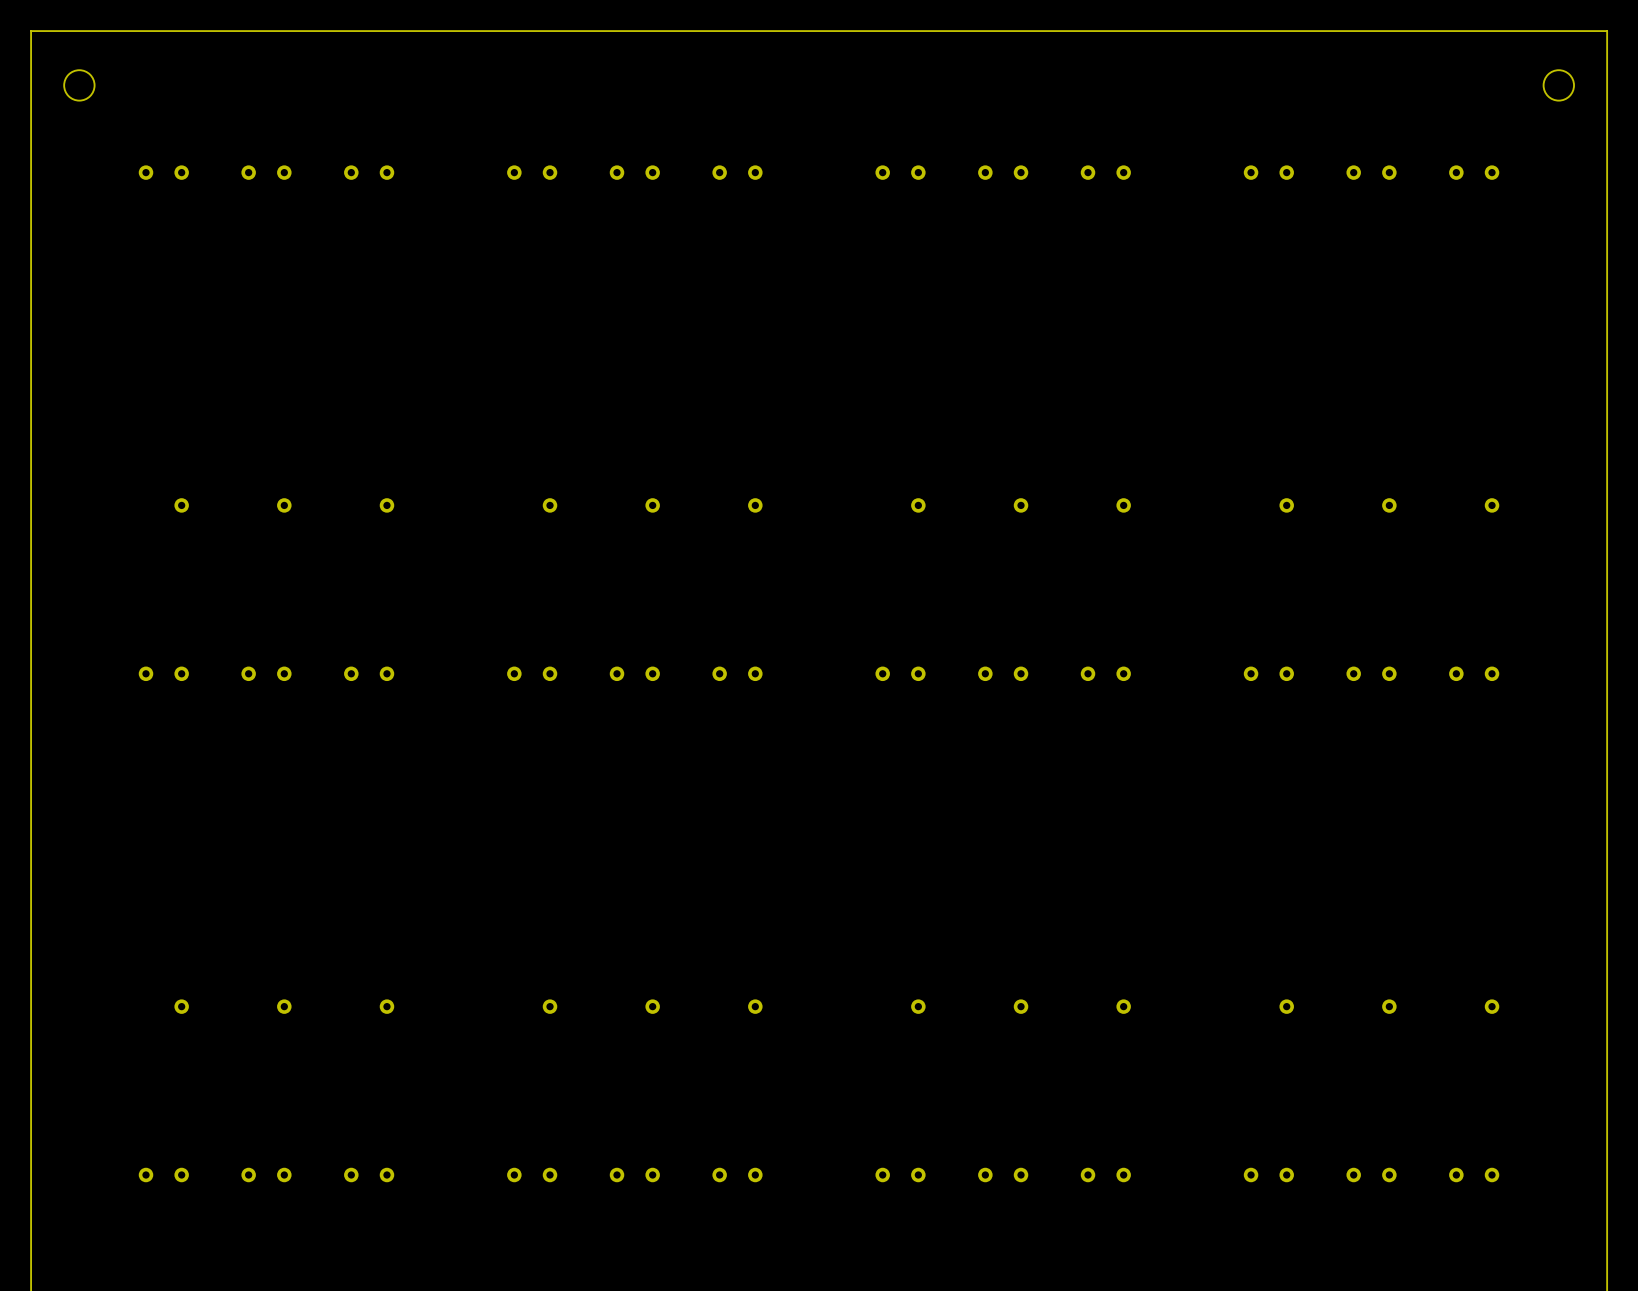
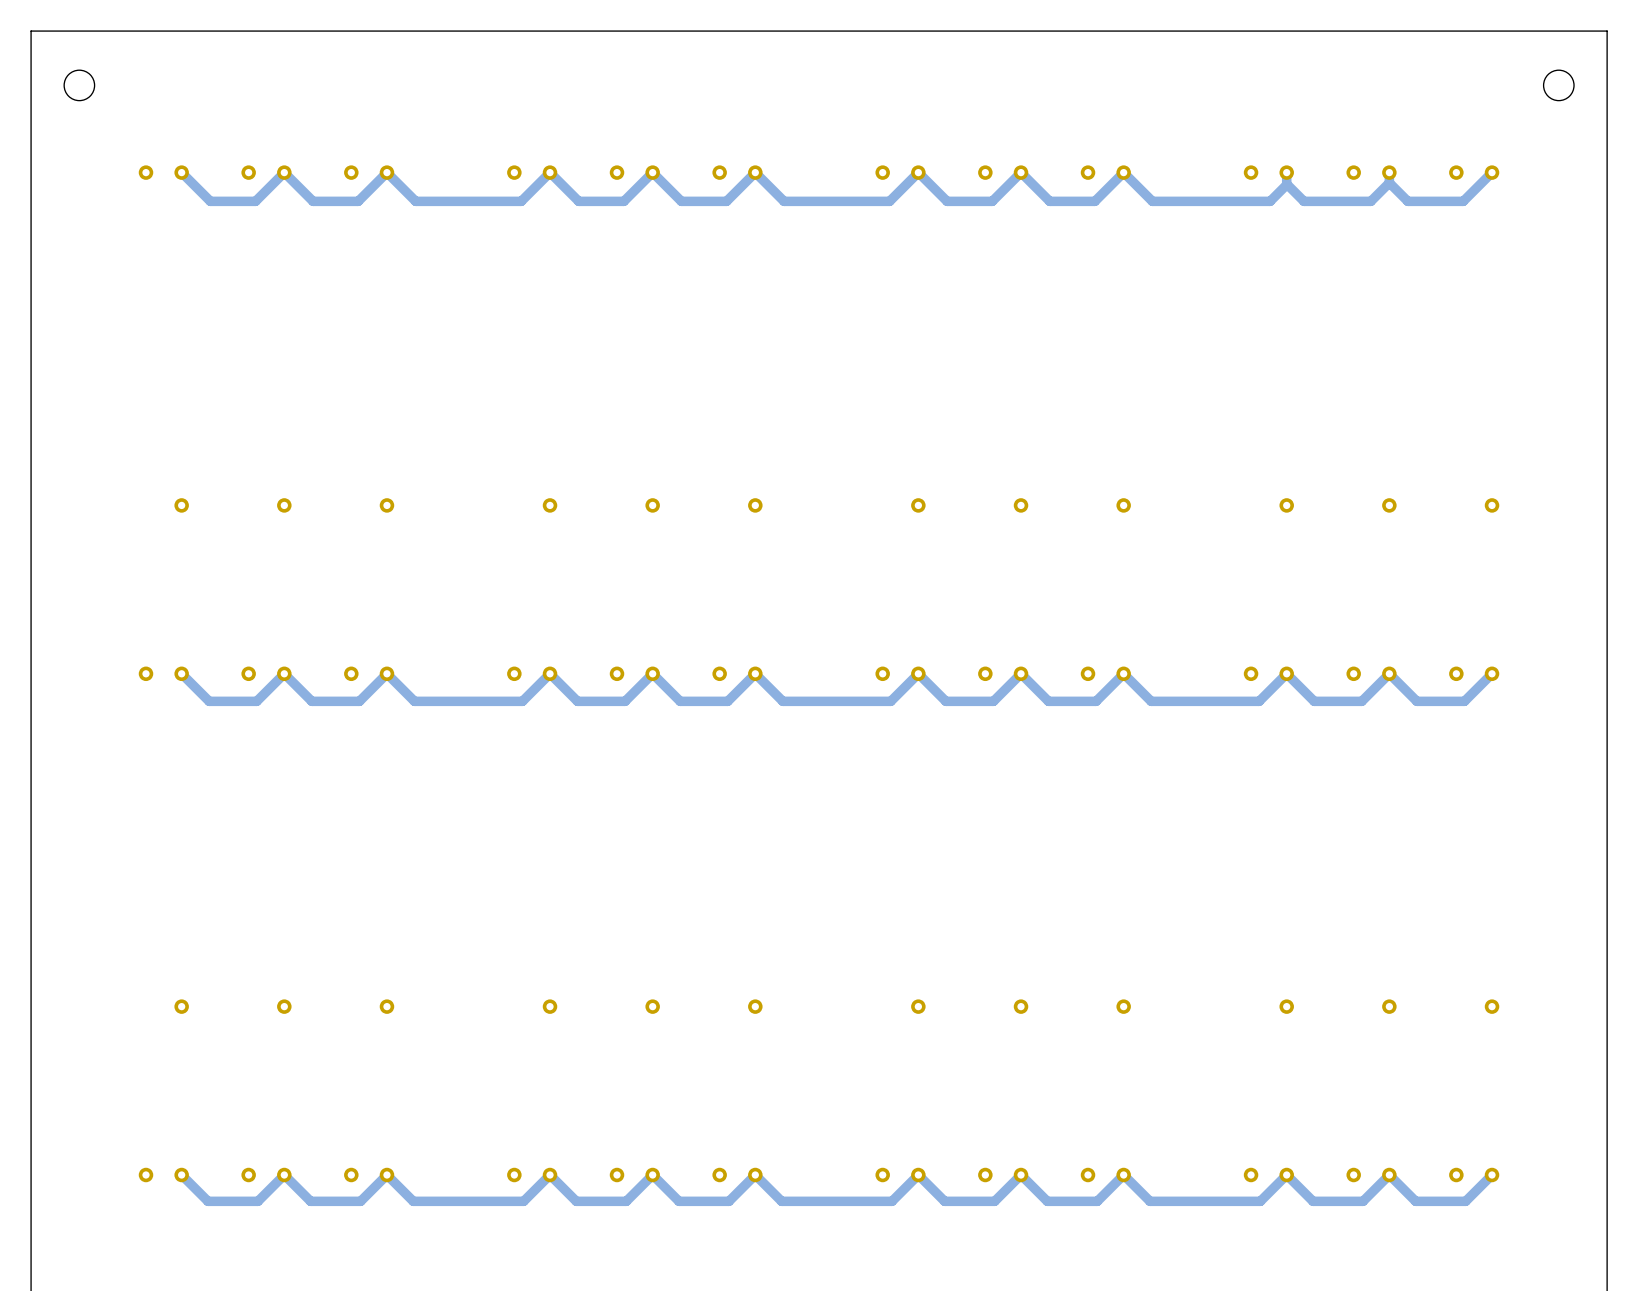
track: none -> (1286, 172) (1286, 184) (1270, 201) (1152, 201) (1123, 172) (1094, 201) (1049, 201) (1021, 172) (992, 201) (947, 201) (918, 172) (889, 201) (784, 201) (755, 172) (726, 201) (681, 201) (652, 172) (623, 201) (578, 201) (550, 172) (521, 201) (415, 201) (386, 172) (358, 201) (313, 201) (284, 172) (255, 201) (210, 201) (181, 172)
track: none -> (1492, 172) (1463, 201) (1407, 201) (1389, 182)
track: none -> (1389, 182) (1370, 201) (1303, 201) (1286, 184)
track: none -> (1492, 673) (1464, 701) (1416, 701) (1389, 673) (1361, 701) (1314, 701) (1286, 673) (1259, 701) (1151, 701) (1123, 673) (1096, 701) (1048, 701) (1021, 673) (993, 701) (945, 701) (918, 673) (890, 701) (782, 701) (755, 673) (727, 701) (680, 701) (652, 673) (625, 701) (577, 701) (550, 673) (522, 701) (414, 701) (386, 673) (359, 701) (311, 701) (284, 673) (256, 701) (209, 701) (181, 673)
track: none -> (1492, 1175) (1465, 1201) (1415, 1201) (1389, 1175) (1363, 1201) (1313, 1201) (1286, 1175) (1260, 1201) (1150, 1201) (1123, 1175) (1097, 1201) (1047, 1201) (1021, 1175) (994, 1201) (944, 1201) (918, 1175) (892, 1201) (781, 1201) (755, 1175) (728, 1201) (678, 1201) (652, 1175) (626, 1201) (576, 1201) (550, 1175) (523, 1201) (413, 1201) (386, 1175) (360, 1201) (310, 1201) (284, 1175) (257, 1201) (207, 1201) (181, 1175)

